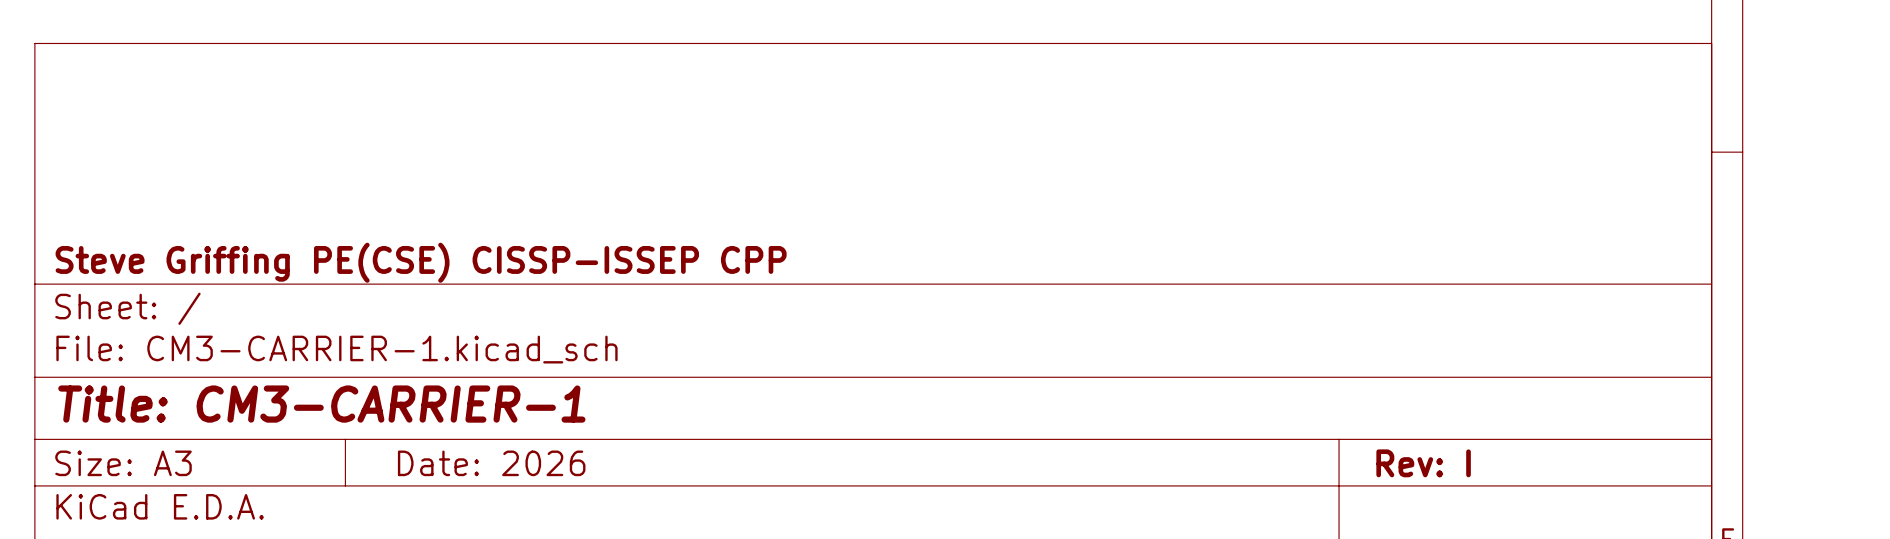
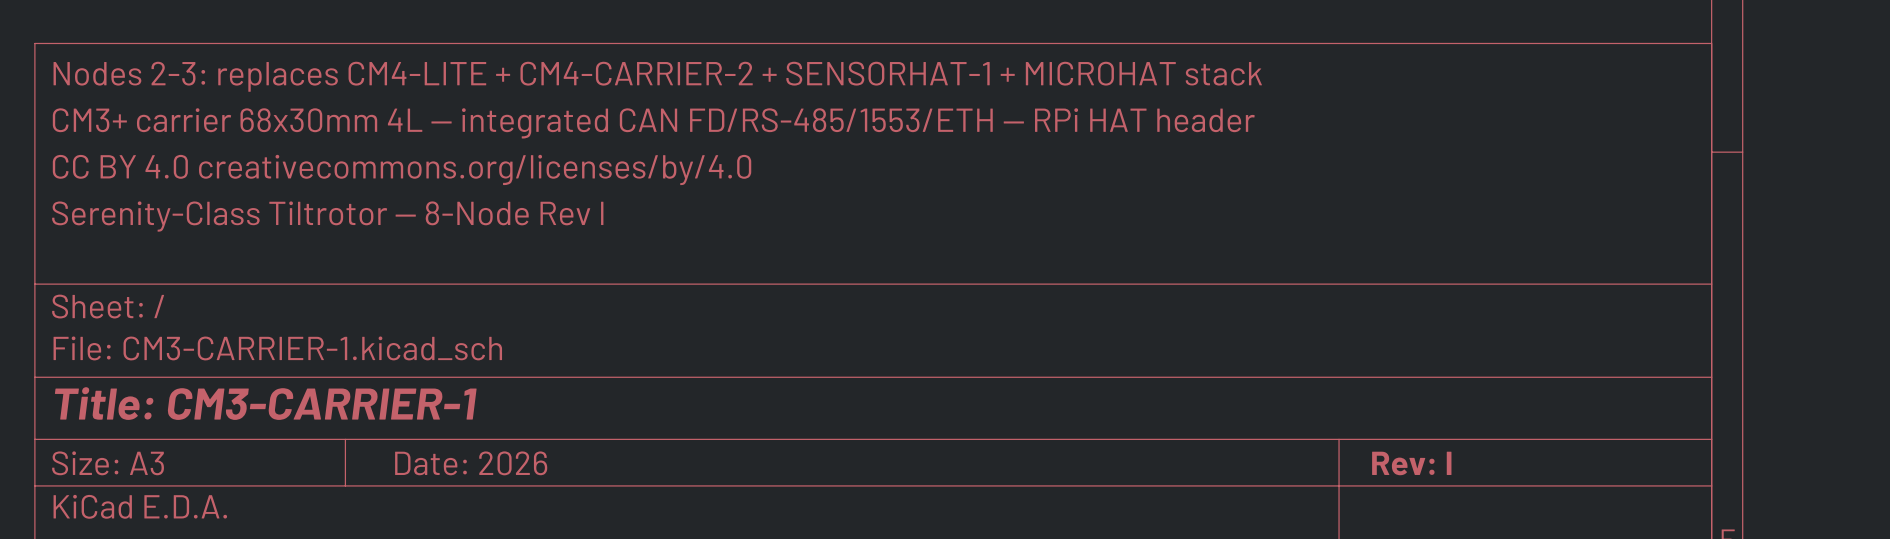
title block: none -> Nodes 2-3: replaces CM4-LITE + CM4-CARRIER-2 + SENSORHAT-1 + MICROHAT stack (657, 76)
title block: none -> CM3+ carrier 68x30mm 4L — integrated CAN FD/RS-485/1553/ETH — RPi HAT header (653, 123)
title block: none -> CC BY 4.0 creativecommons.org/licenses/by/4.0 (402, 169)
title block: none -> Serenity-Class Tiltrotor — 8-Node Rev I (327, 216)
title block: Steve Griffing PE(CSE) CISSP-ISSEP CPP (421, 262) -> none

